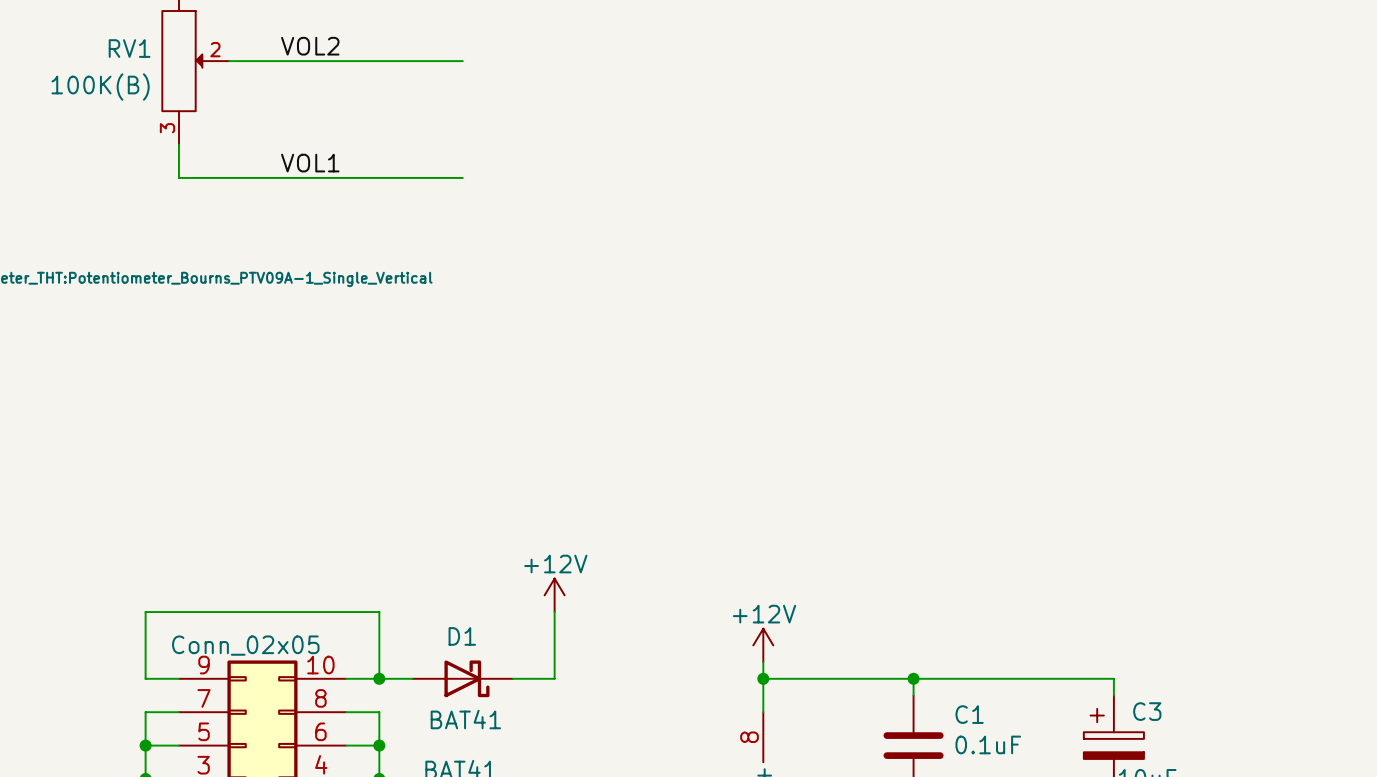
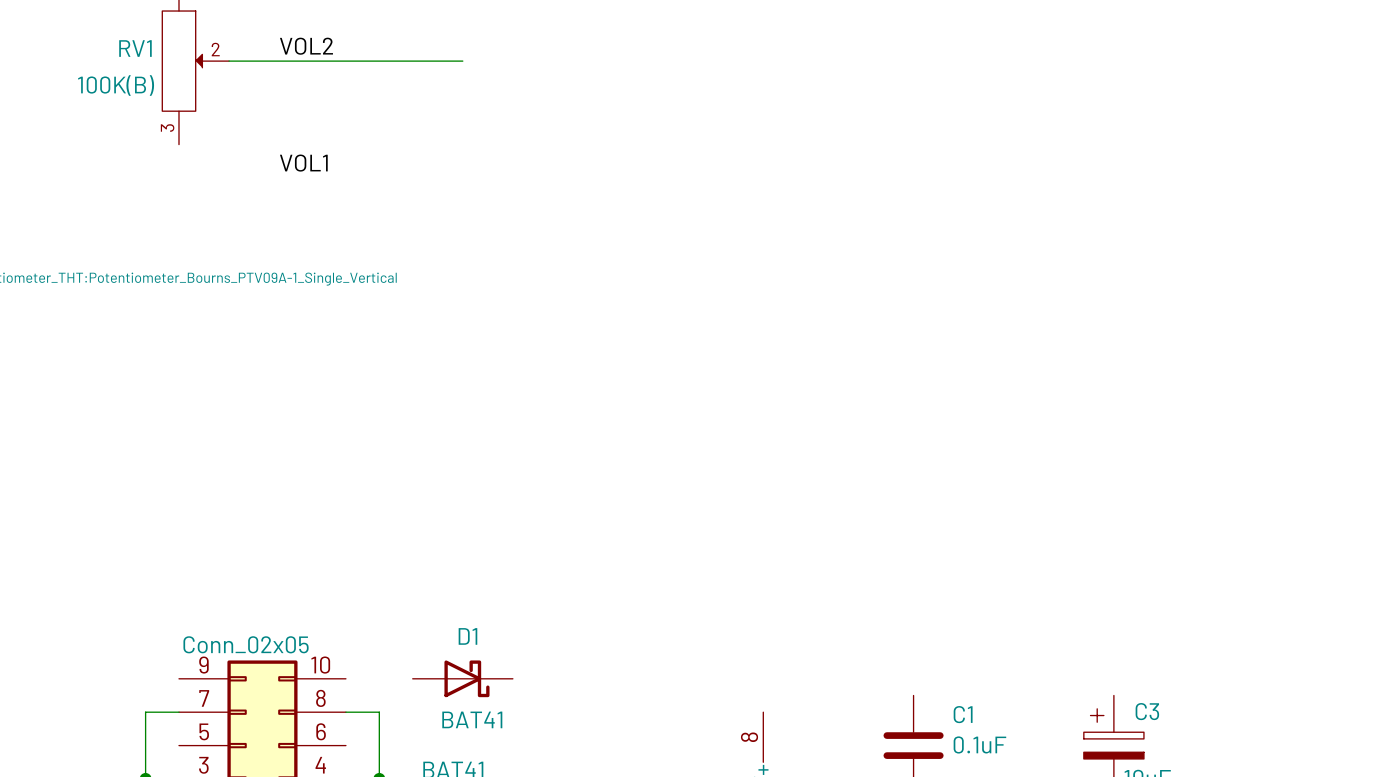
wire: (178, 144) (178, 177) (462, 177) -> none
power symbol: +12V (554, 595) -> none
wire: (554, 612) (554, 678) (512, 678) -> none
power symbol: +12V (763, 645) -> none
wire: (763, 662) (763, 712) -> none
wire: (178, 678) (145, 678) (145, 612) (379, 612) (379, 678) -> none
wire: (345, 678) (412, 678) -> none
junction: (379, 678) -> none
wire: (763, 678) (1113, 678) (1113, 695) -> none
junction: (763, 678) -> none
wire: (913, 678) (913, 695) -> none
junction: (913, 678) -> none
wire: (145, 745) (178, 745) -> none
junction: (145, 745) -> none
wire: (345, 745) (379, 745) -> none
junction: (379, 745) -> none

